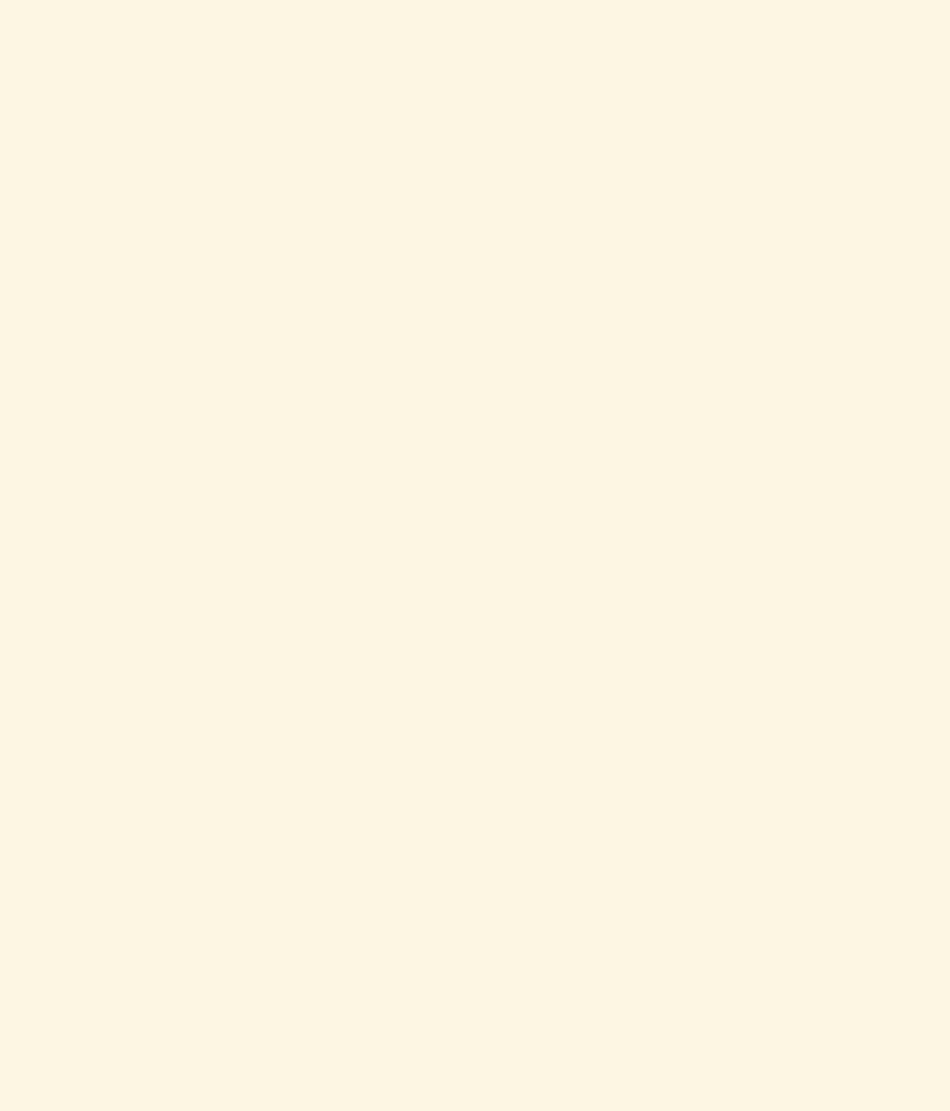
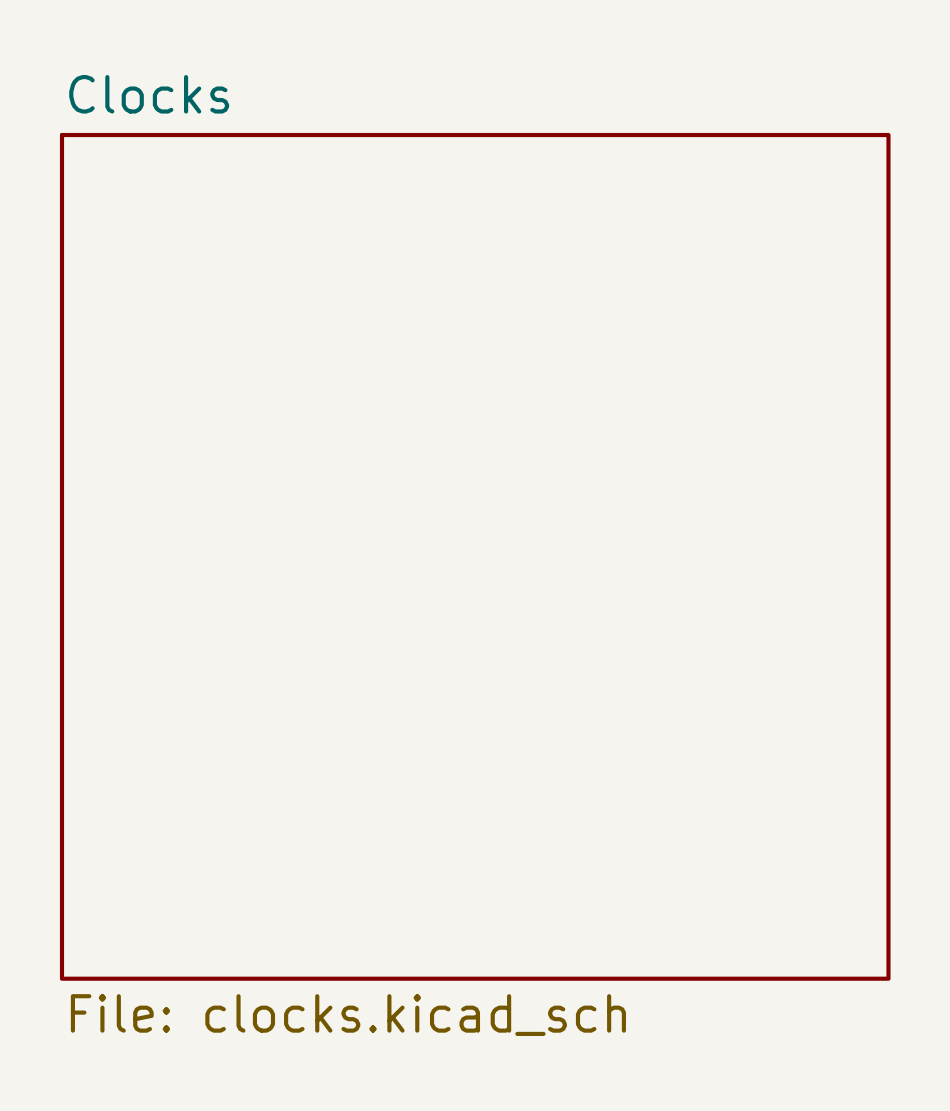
sheet Clocks: none -> File: clocks.kicad_sch (475, 556)

